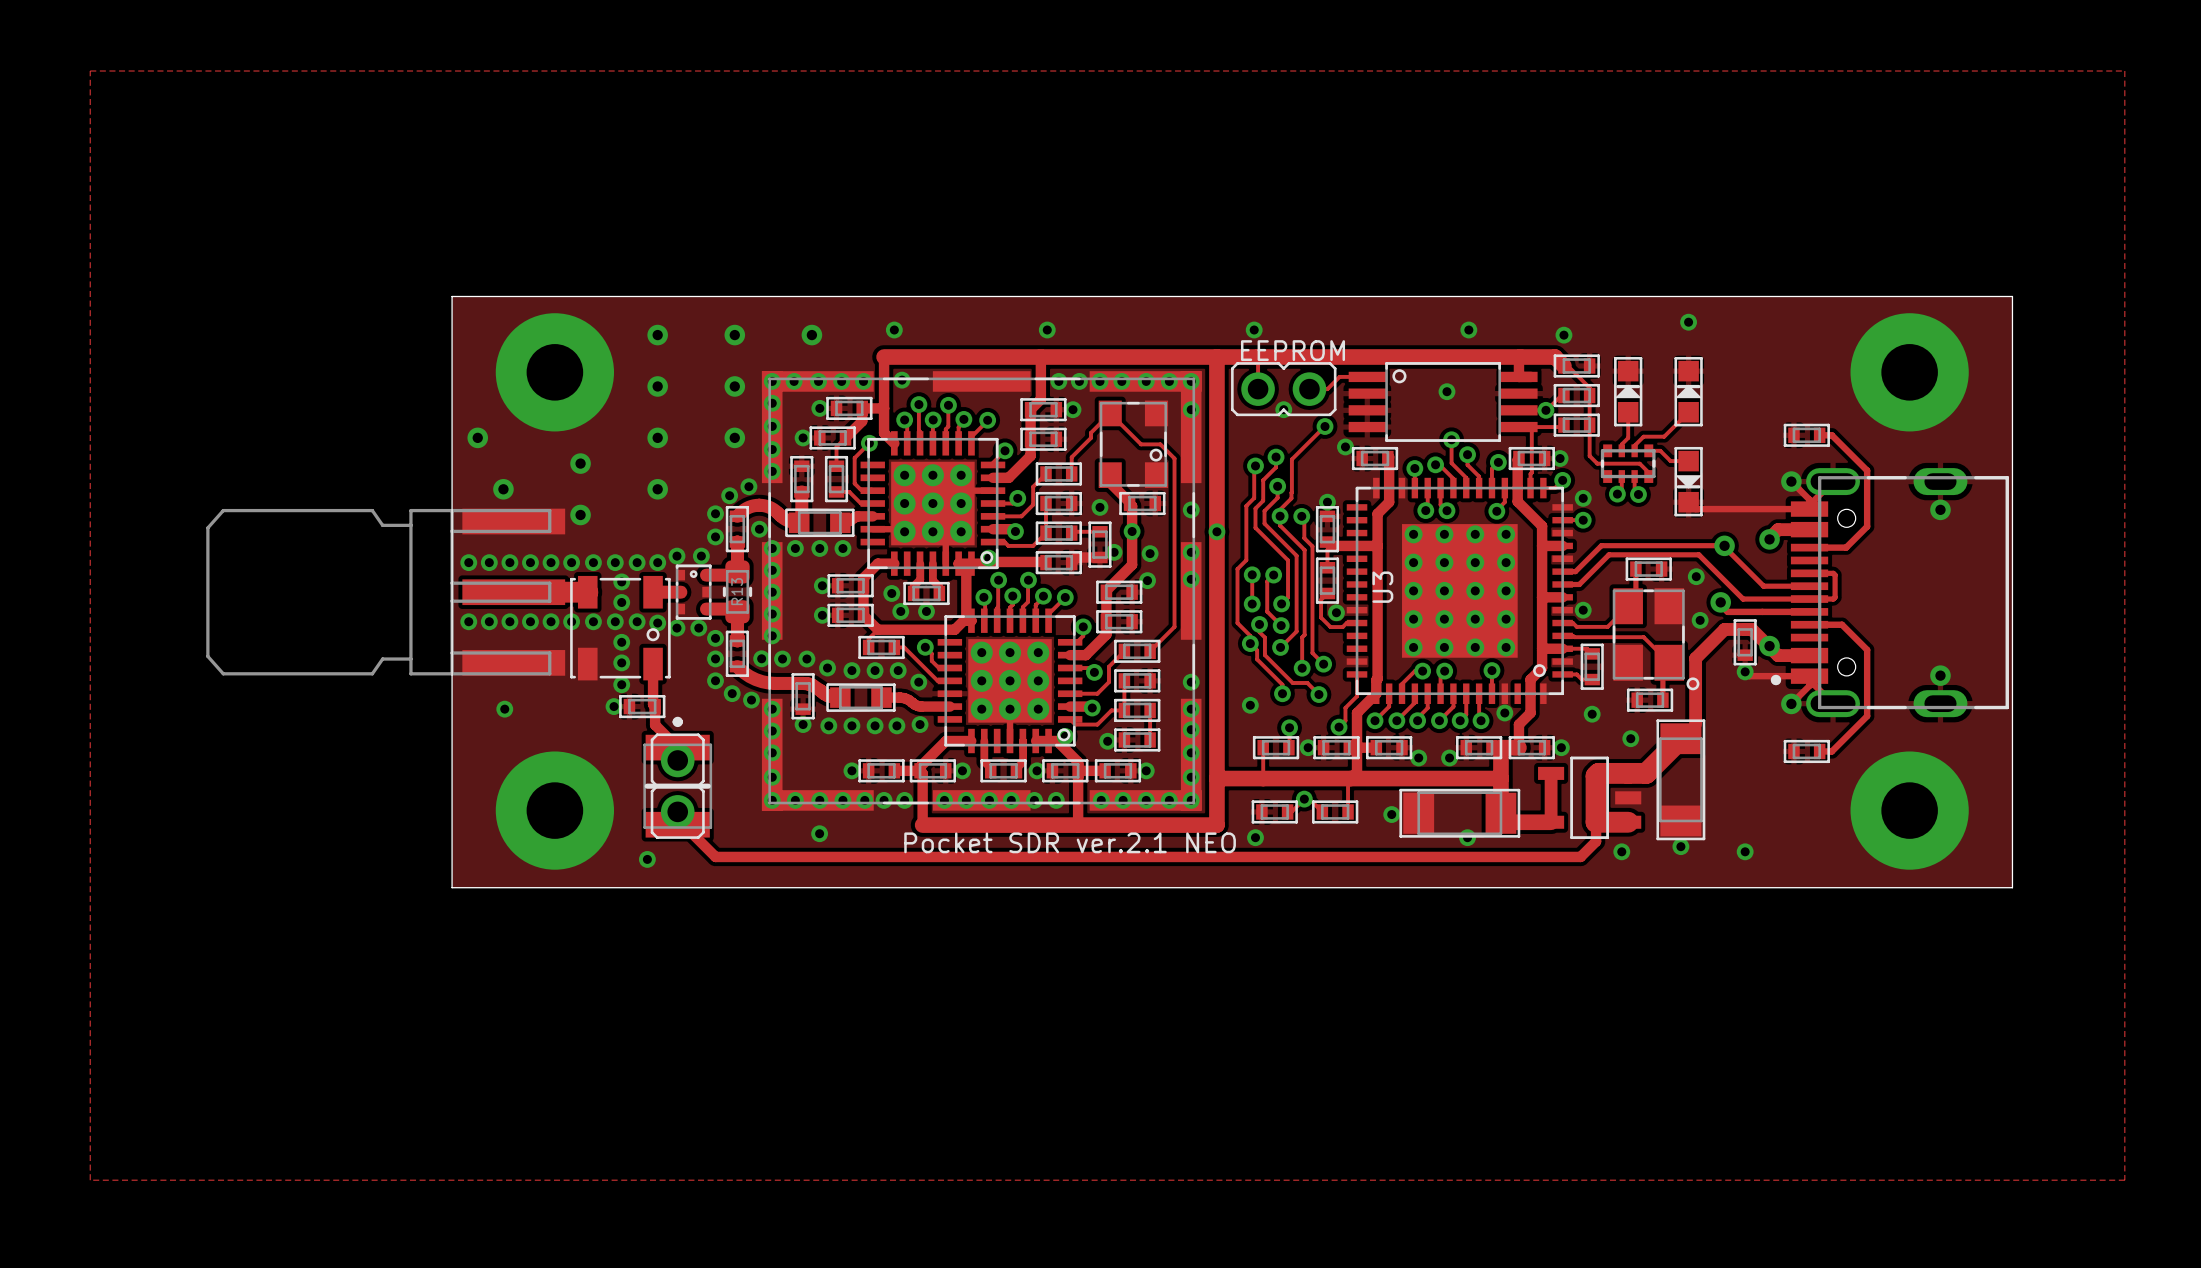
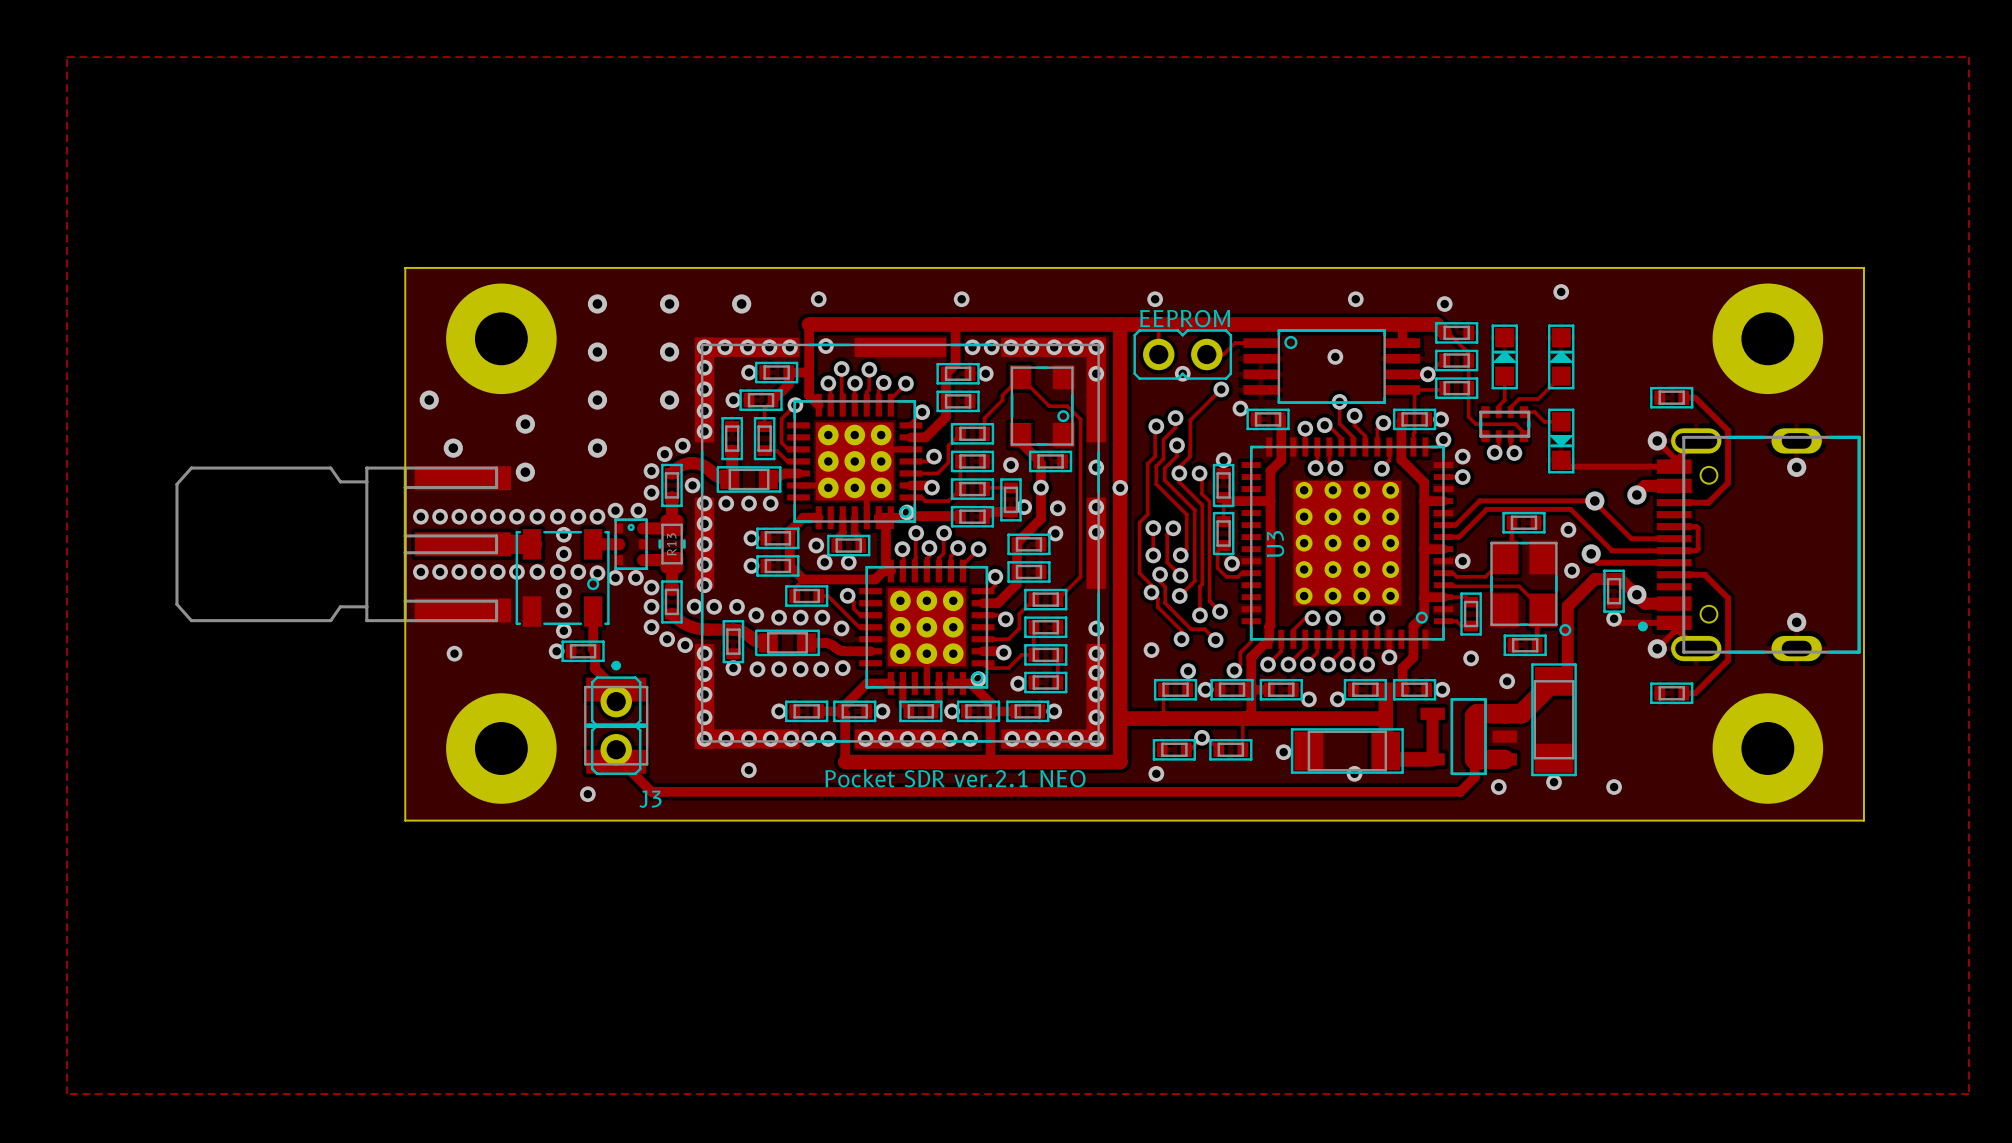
J3 name: none -> J3 (650, 799)

